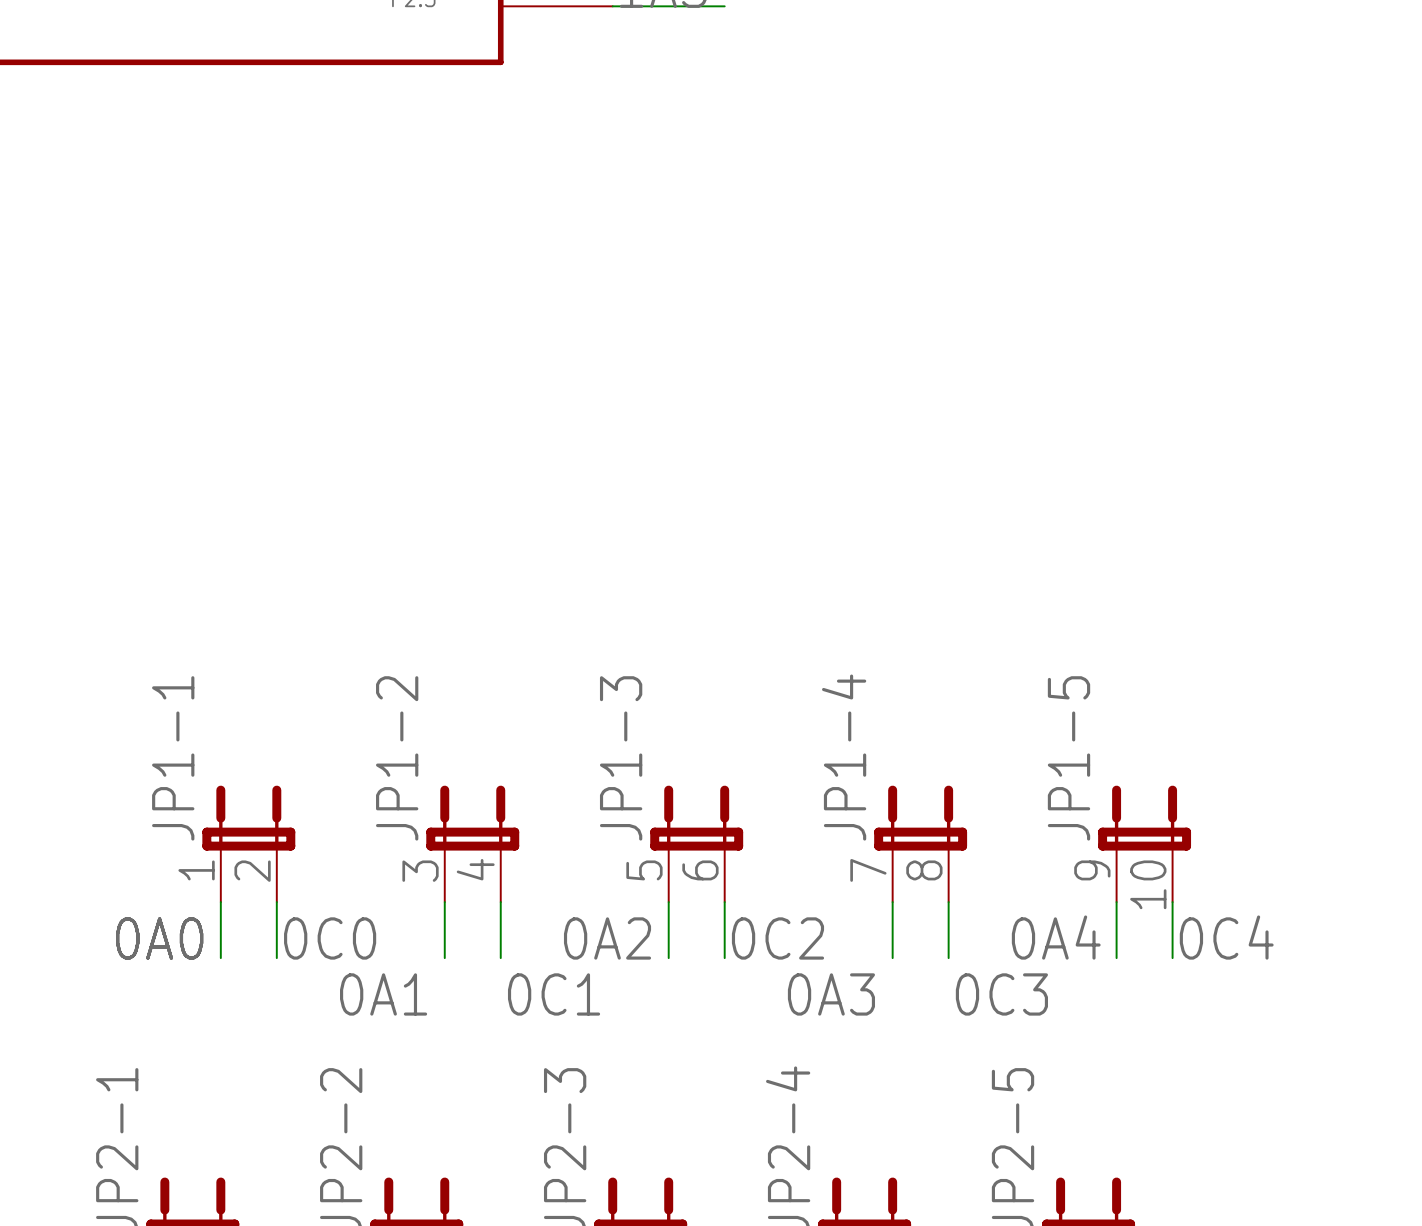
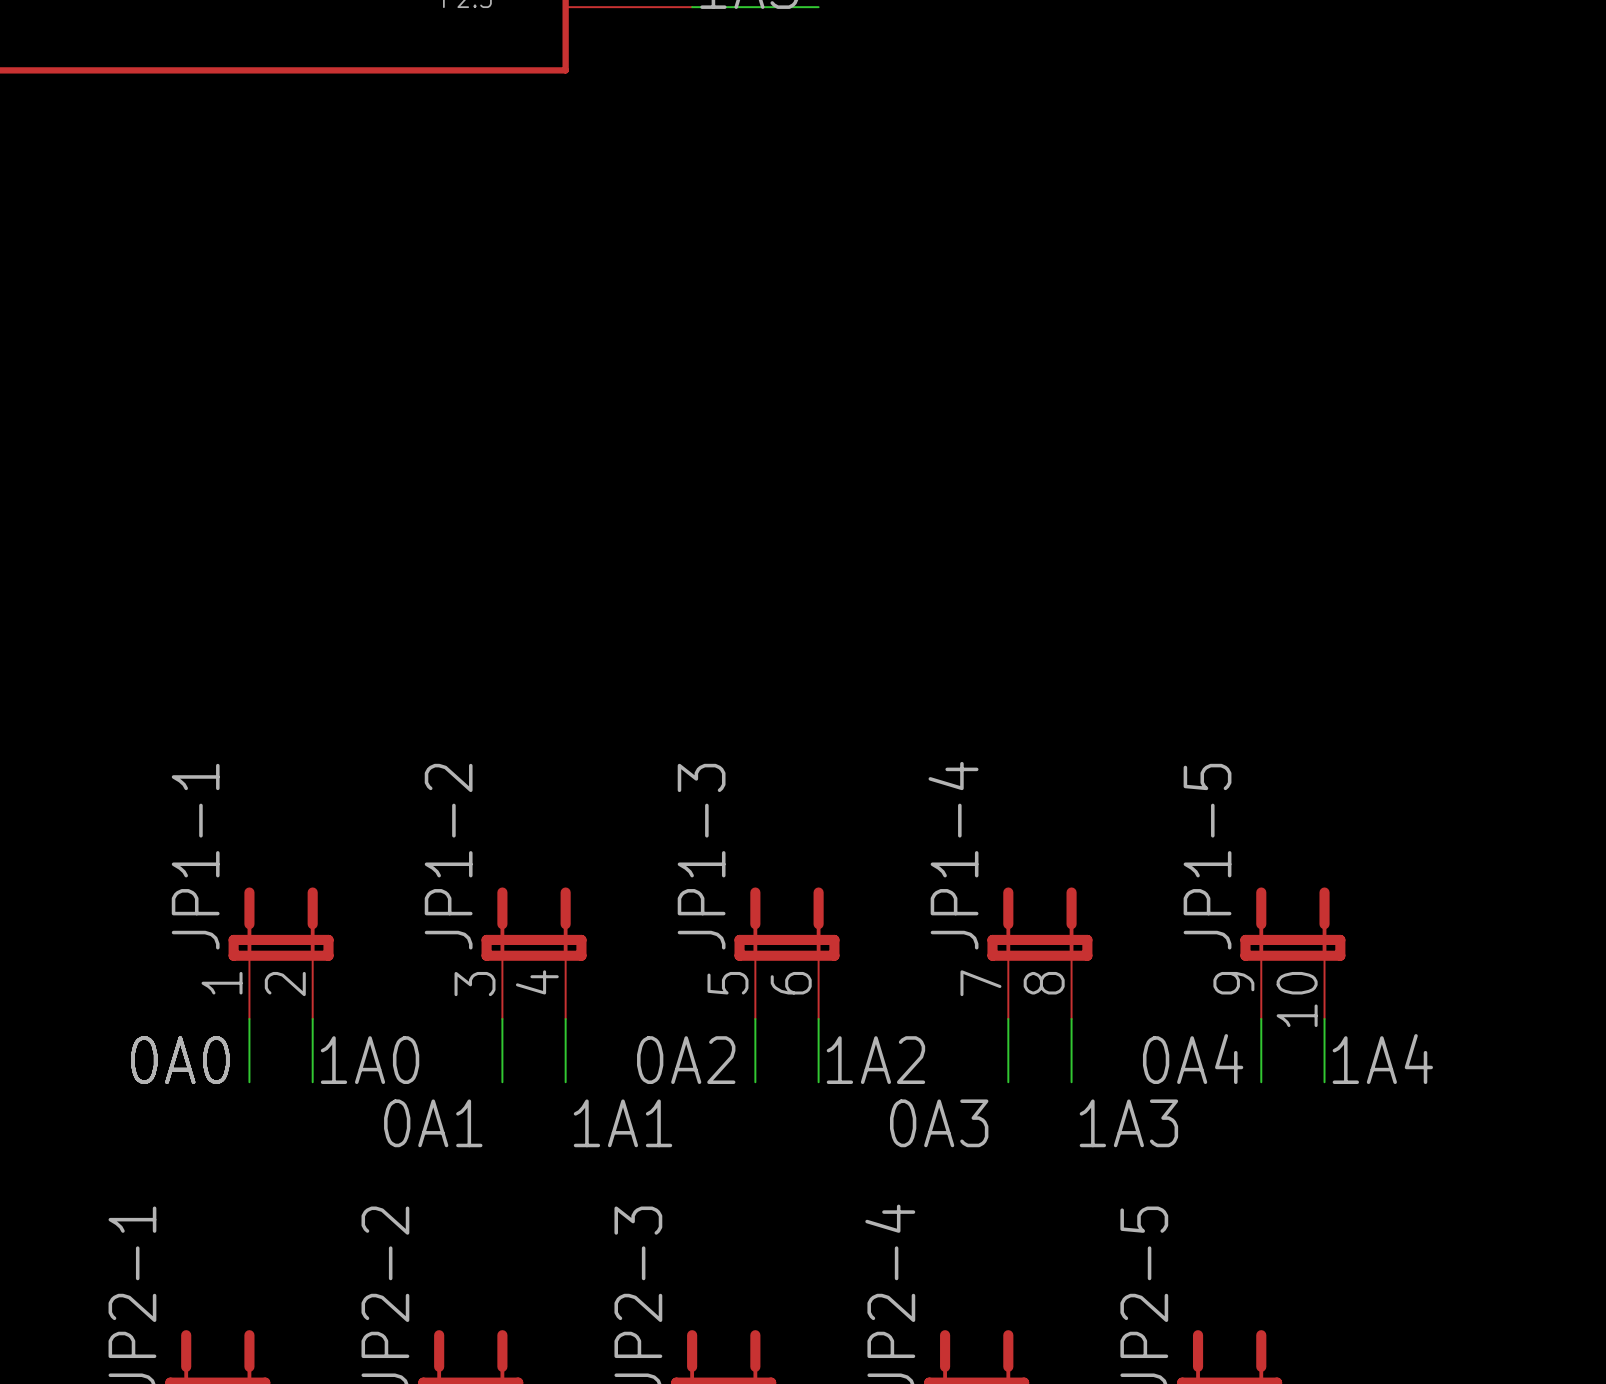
label: 0C4 (1226, 937) -> 1A4 (1382, 1059)
label: 0C0 (330, 938) -> 1A0 (370, 1060)
label: 0C2 (777, 938) -> 1A2 (875, 1060)
label: 0C1 (554, 994) -> 1A1 (622, 1123)
label: 0C3 (1001, 994) -> 1A3 (1128, 1123)

